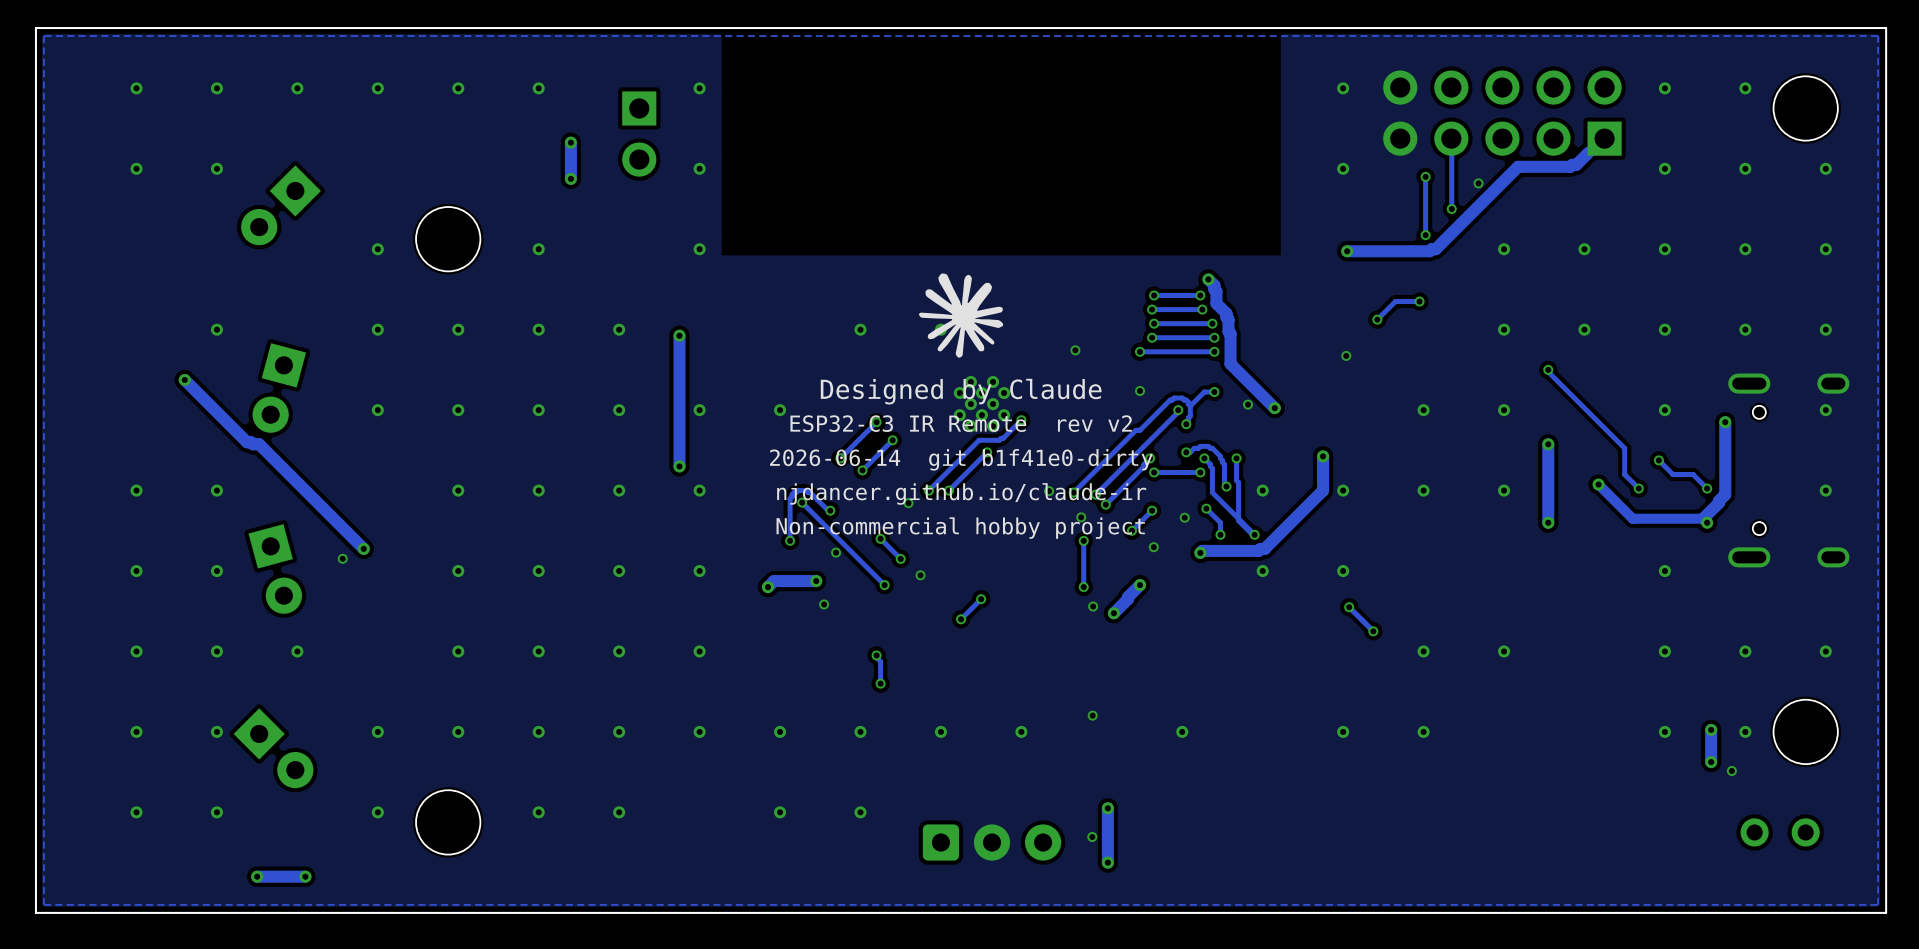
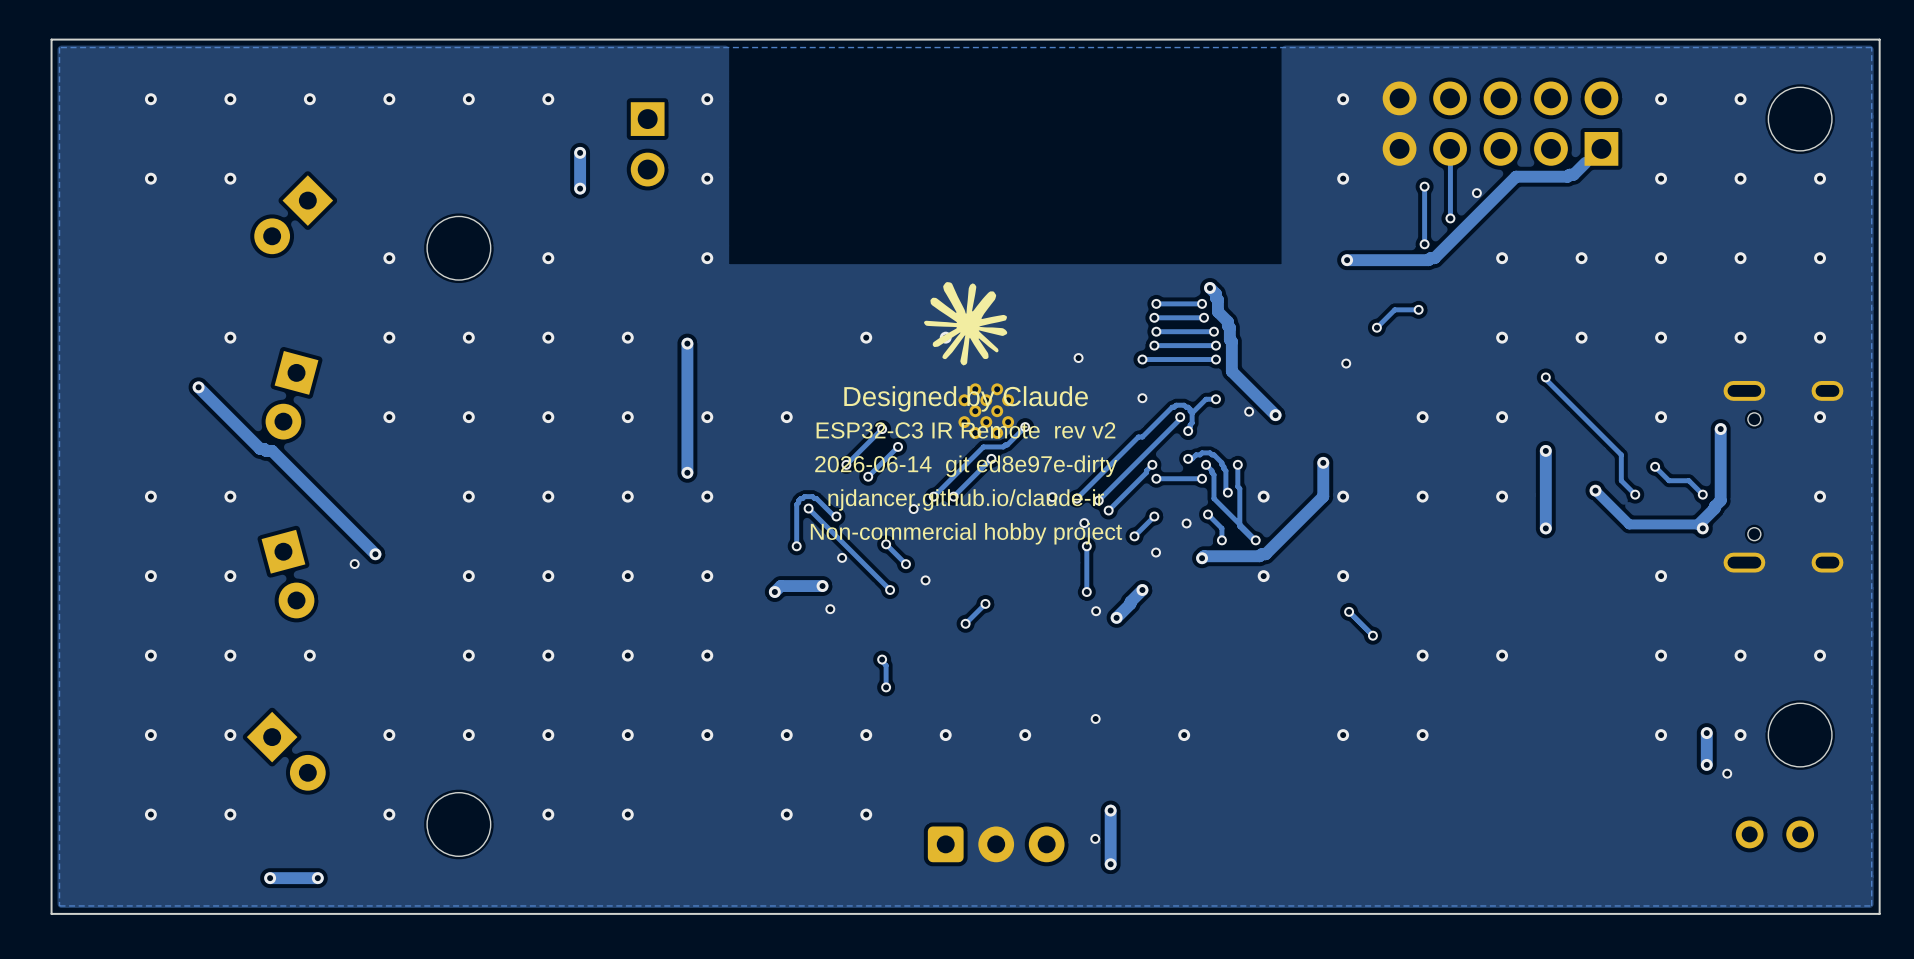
text: 2026-06-14 git b1f41e0-dirty (961, 459) -> 2026-06-14 git ed8e97e-dirty (966, 466)

